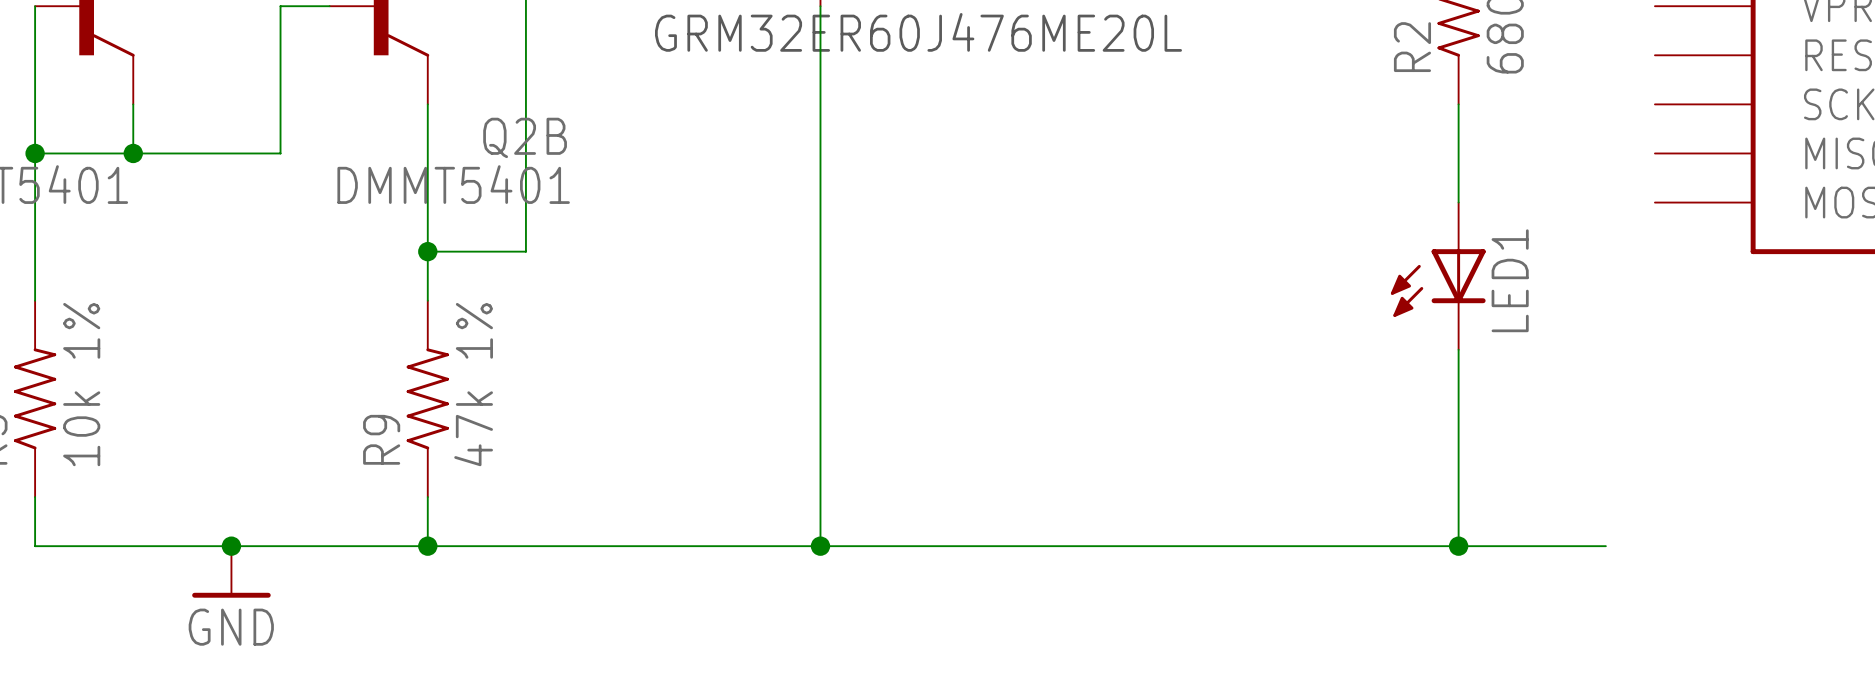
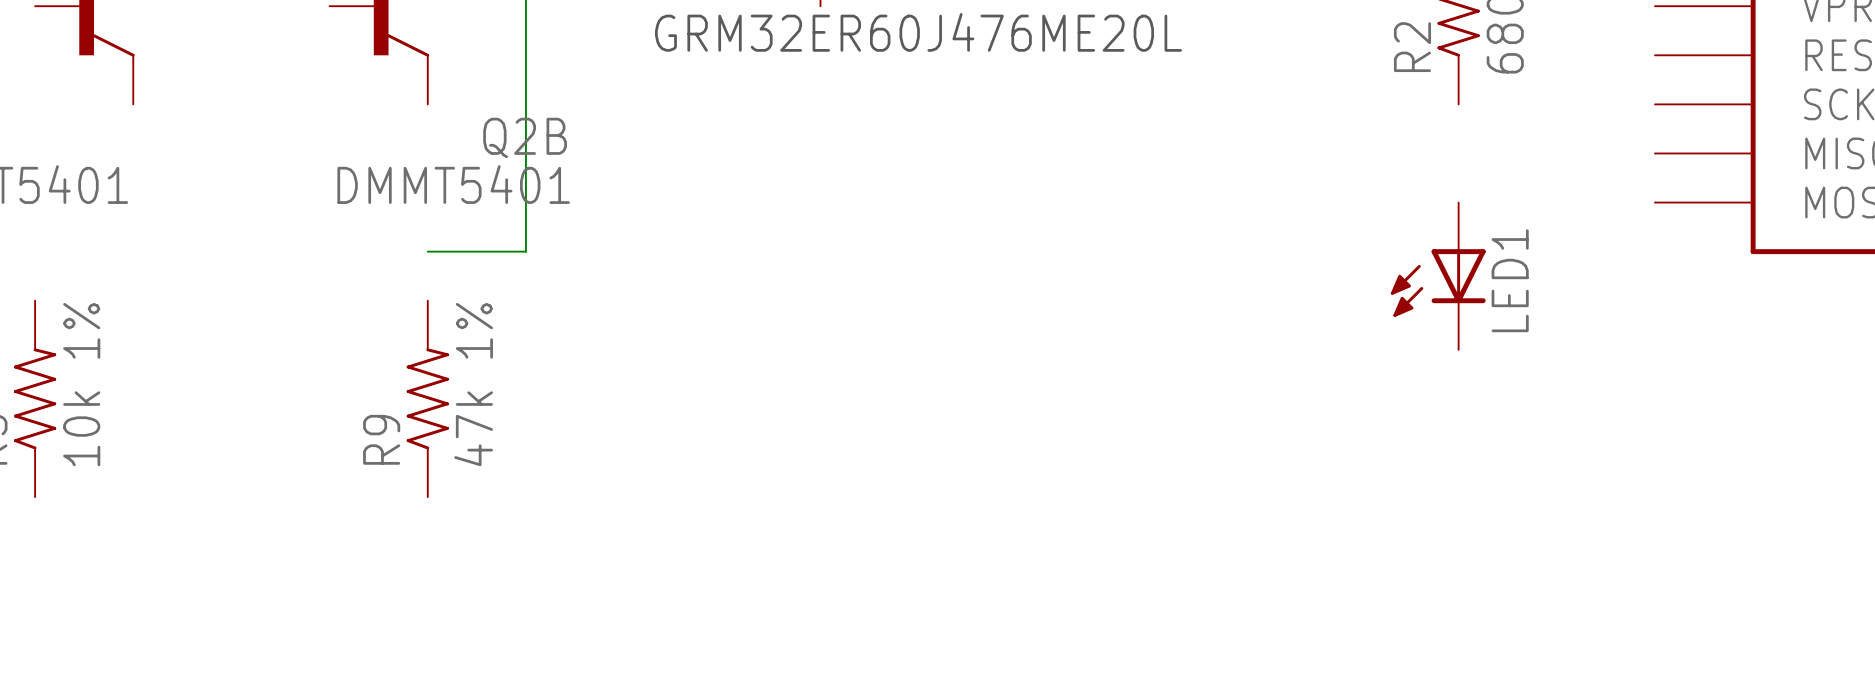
wire: (35, 6) (35, 300) -> none
wire: (329, 6) (280, 6) (280, 153) (35, 153) -> none
wire: (820, 6) (820, 546) -> none
wire: (133, 104) (133, 153) -> none
wire: (427, 104) (427, 300) -> none
wire: (1458, 104) (1458, 202) -> none
junction: (35, 153) -> none
junction: (133, 153) -> none
junction: (427, 251) -> none
wire: (1458, 349) (1458, 546) -> none
wire: (35, 497) (35, 546) (1605, 546) -> none
wire: (427, 497) (427, 546) -> none
junction: (231, 546) -> none
junction: (427, 546) -> none
junction: (820, 546) -> none
junction: (1458, 546) -> none
power symbol: GND (231, 571) -> none

